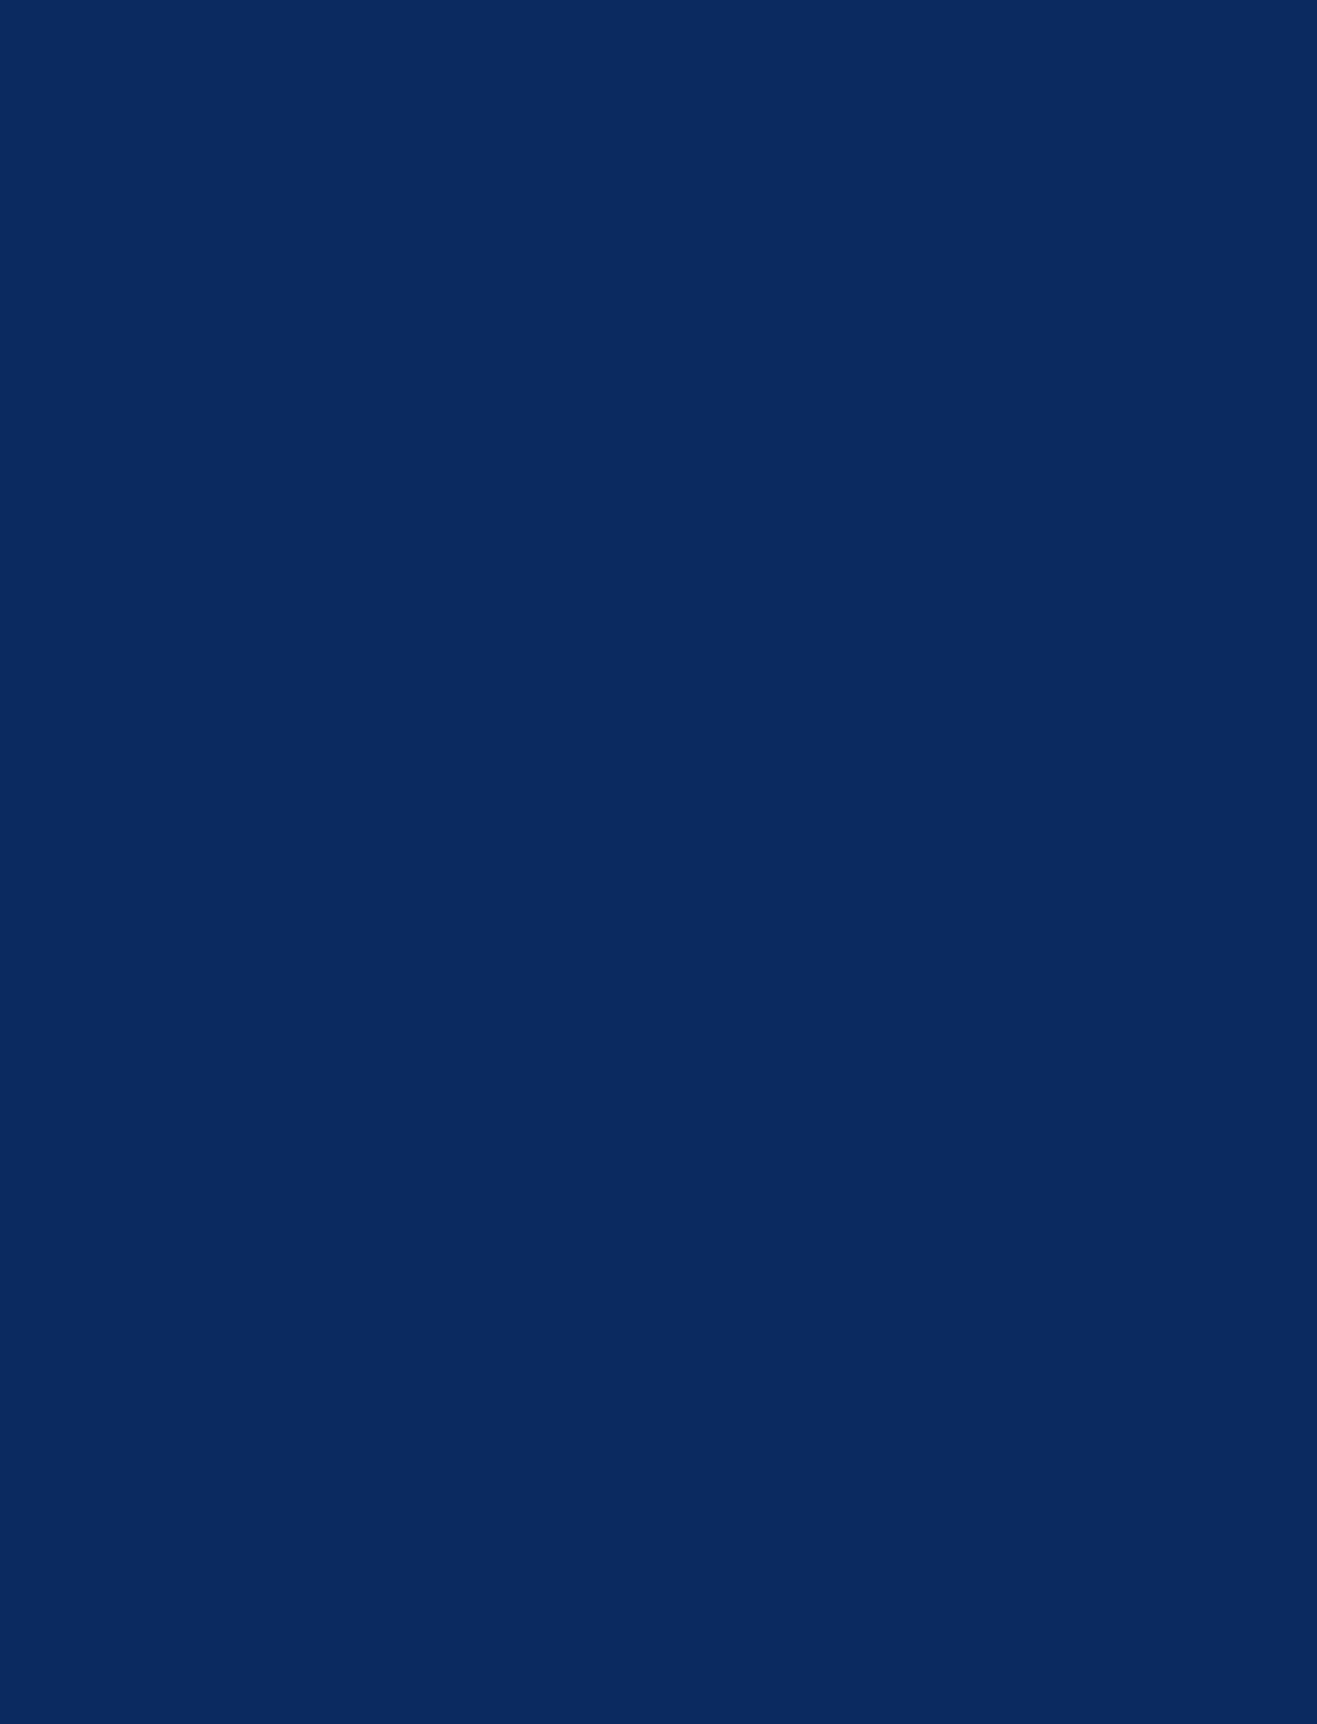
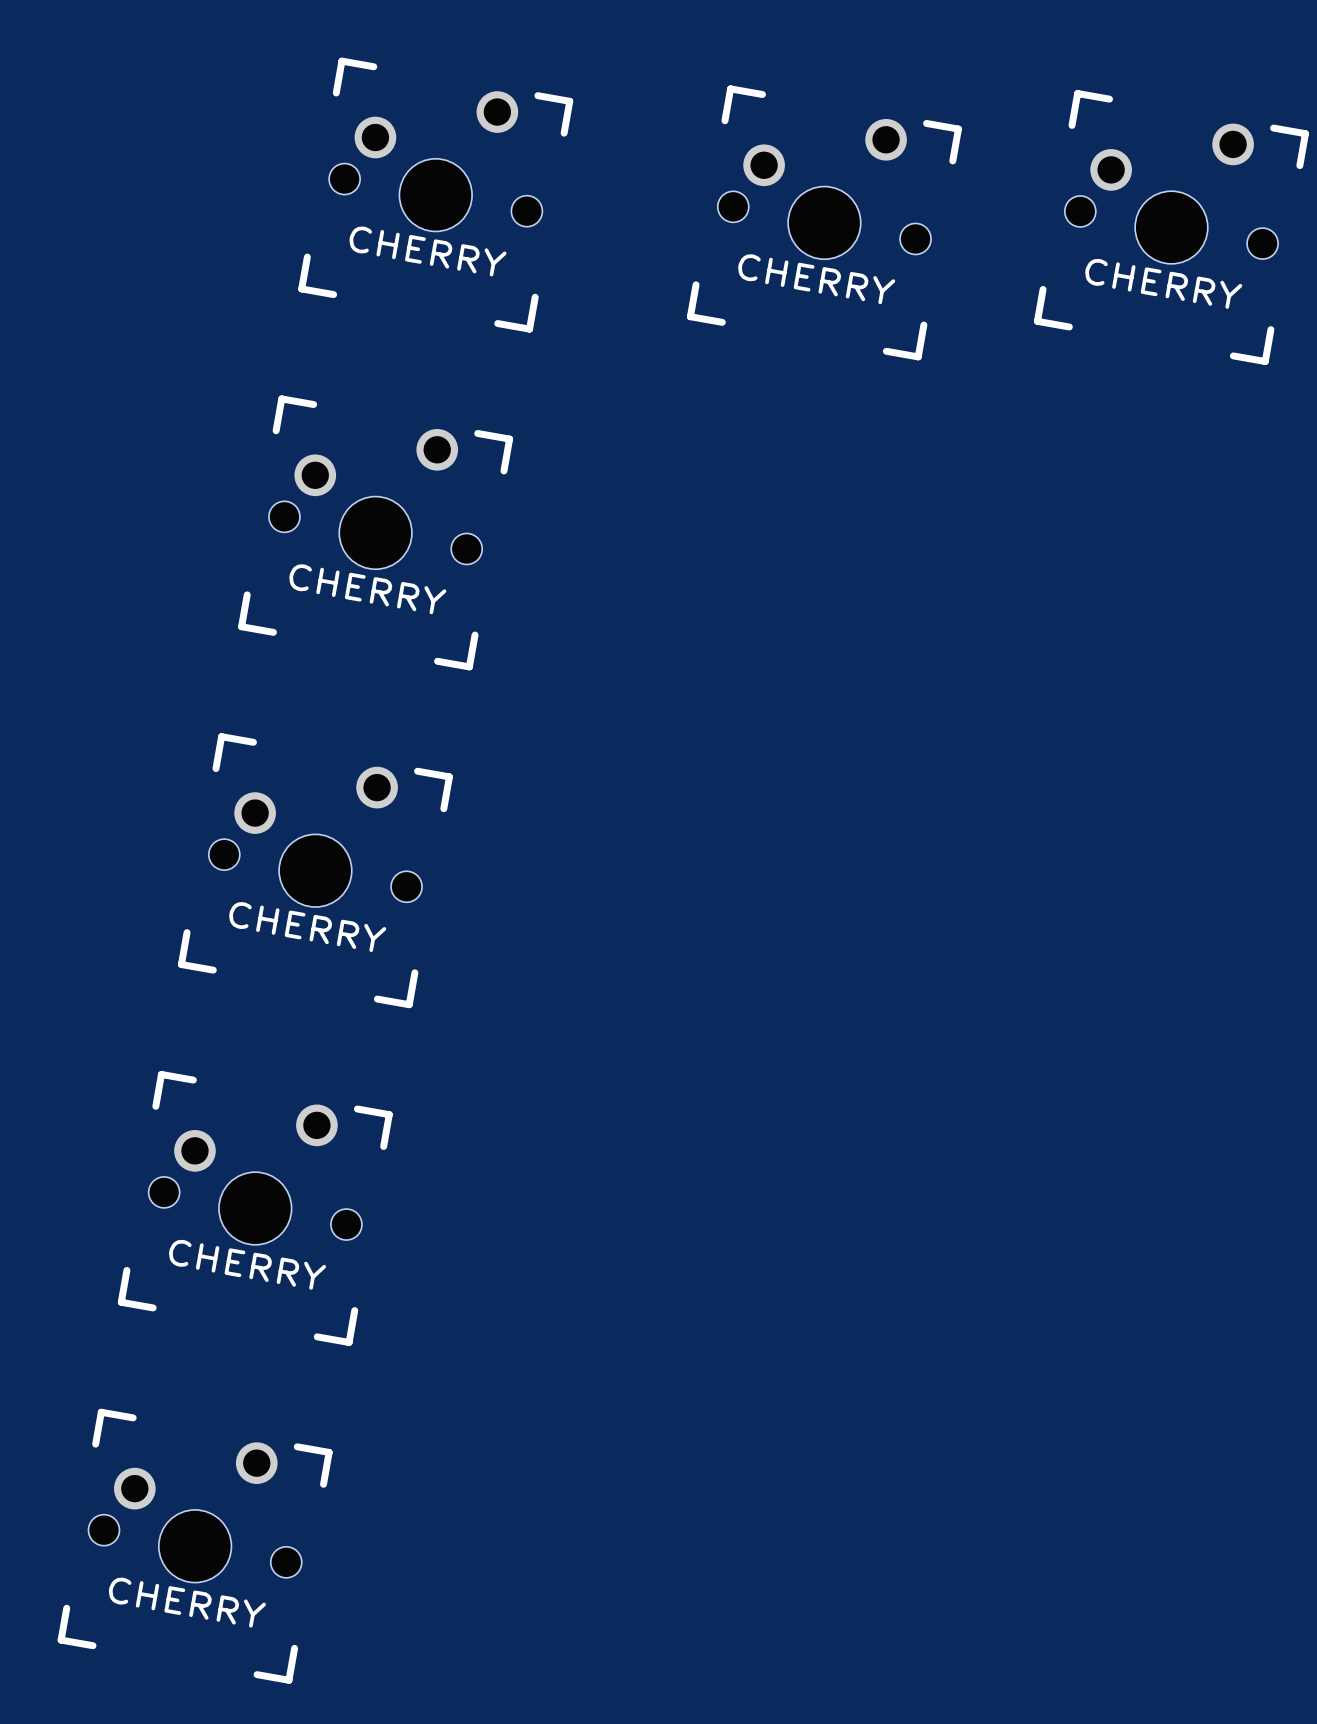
CHERRY: none -> (435, 195)
CHERRY: none -> (824, 222)
CHERRY: none -> (1171, 227)
CHERRY: none -> (375, 532)
CHERRY: none -> (315, 870)
CHERRY: none -> (255, 1208)
CHERRY: none -> (195, 1546)

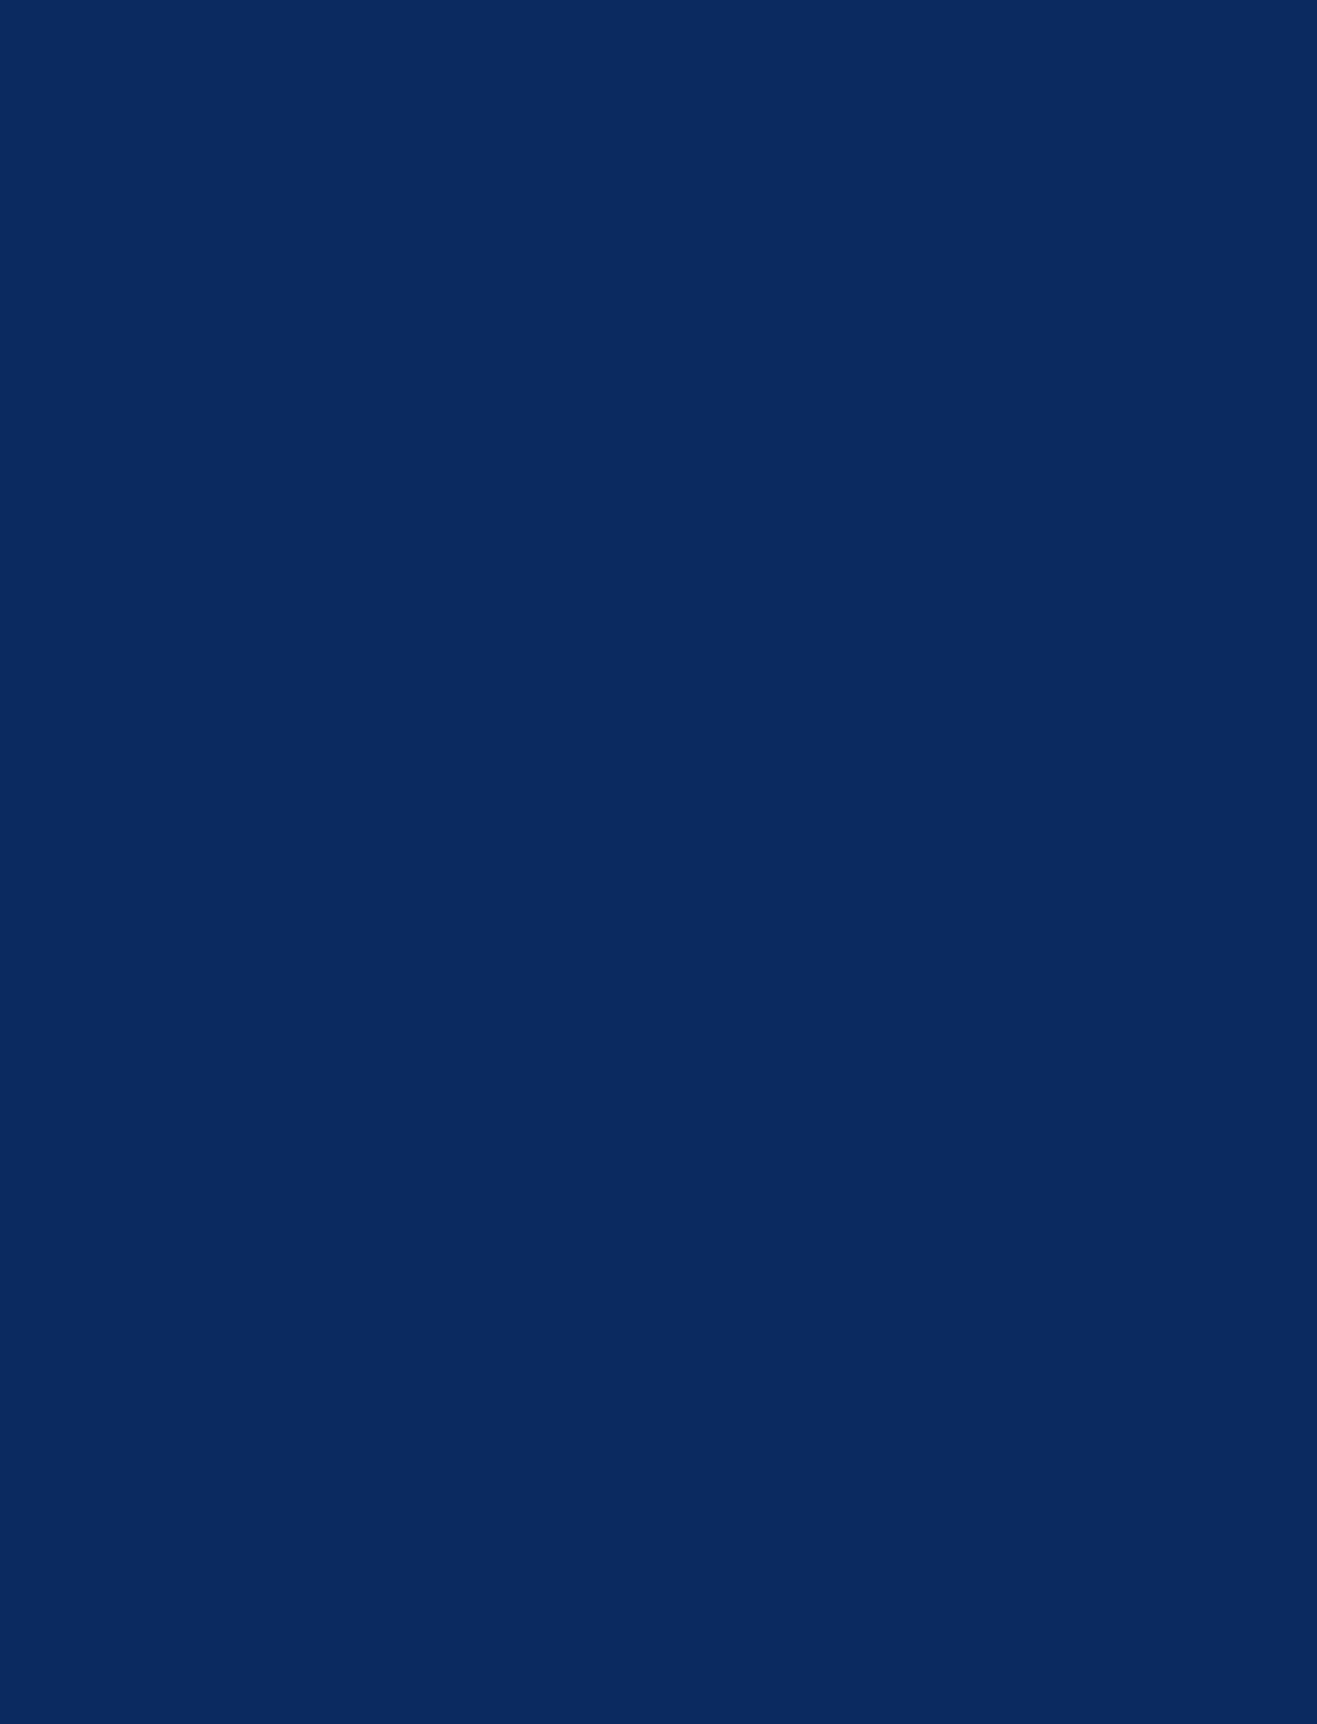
CHERRY: (435, 195) -> none
CHERRY: (824, 222) -> none
CHERRY: (1171, 227) -> none
CHERRY: (375, 532) -> none
CHERRY: (315, 870) -> none
CHERRY: (255, 1208) -> none
CHERRY: (195, 1546) -> none

